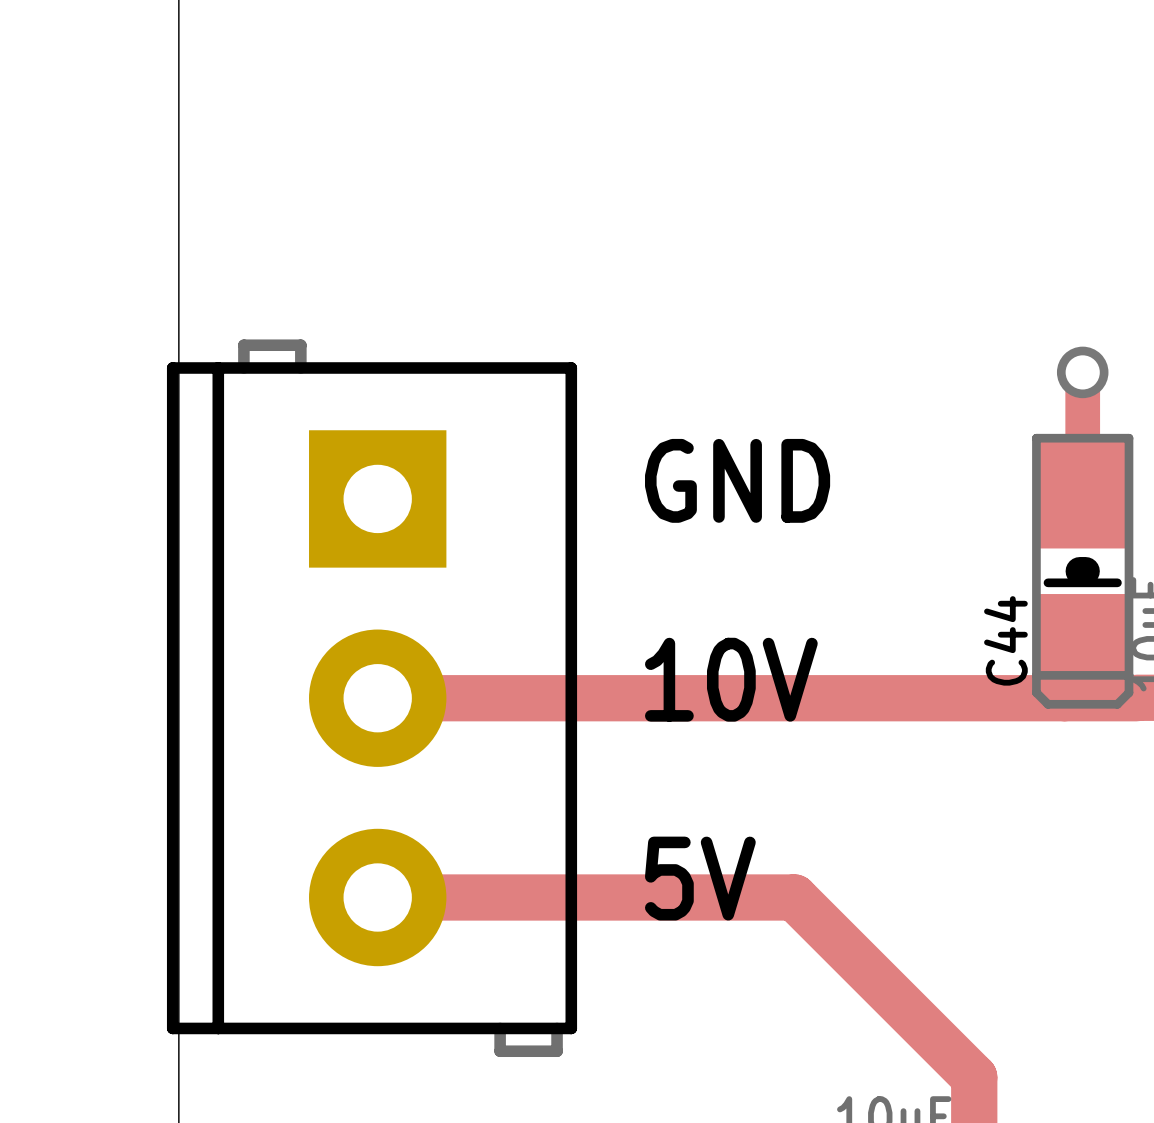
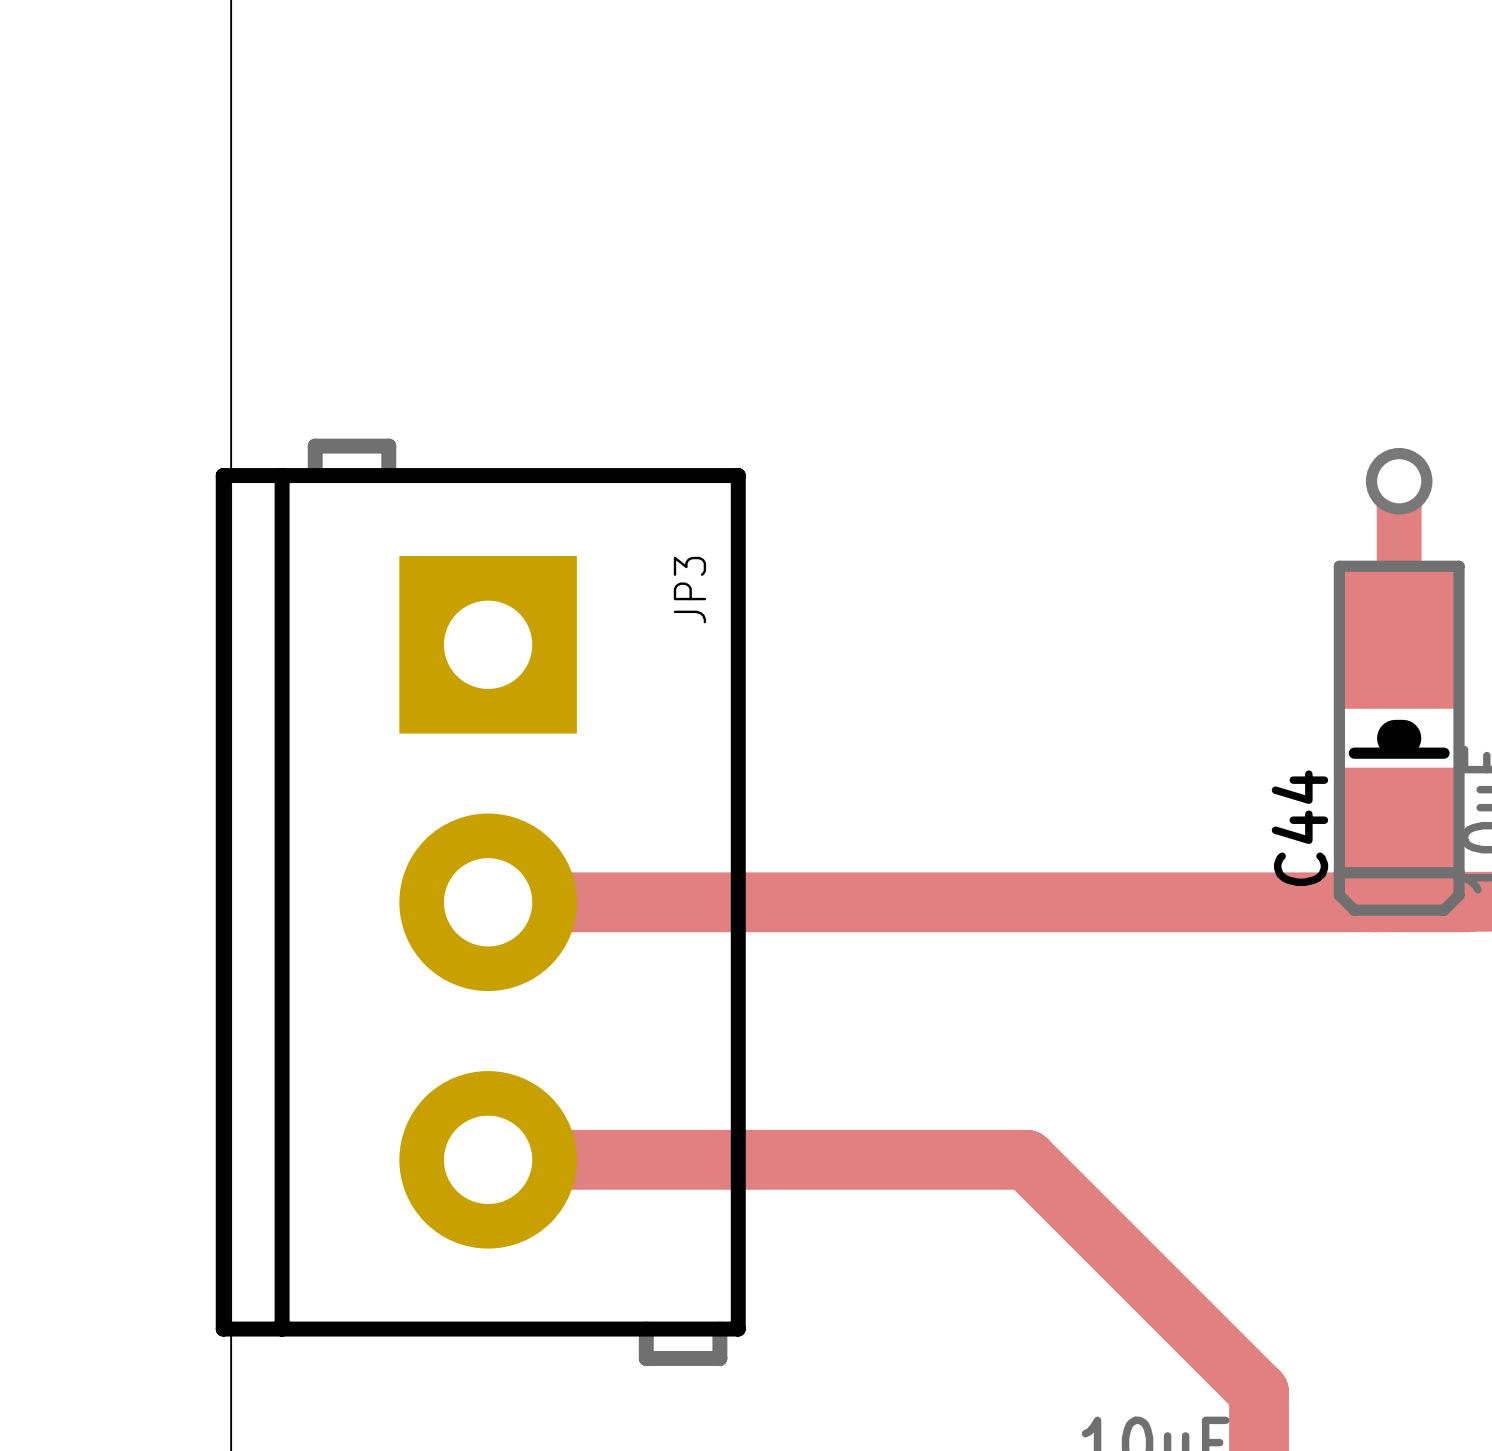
JP3 name: none -> JP3 (689, 590)
text: GND (737, 480) -> none
text: 10V (731, 679) -> none
text: 5V (700, 878) -> none

